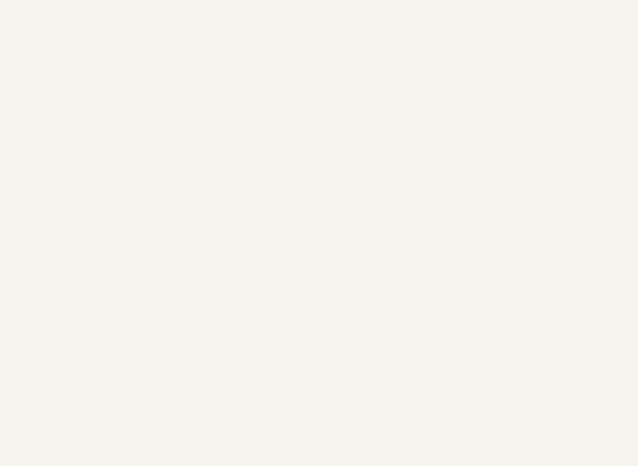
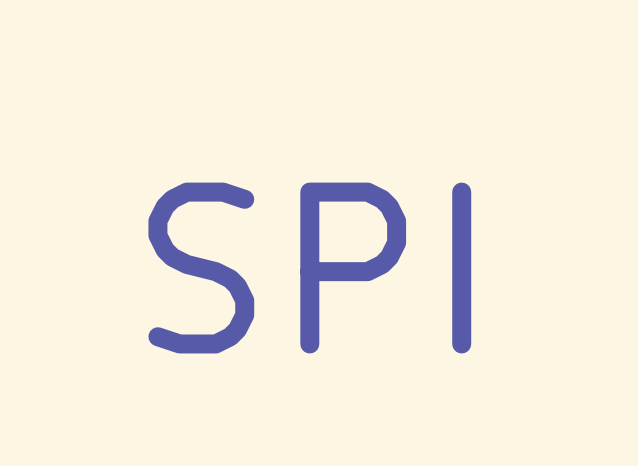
text: none -> SPI (309, 268)

